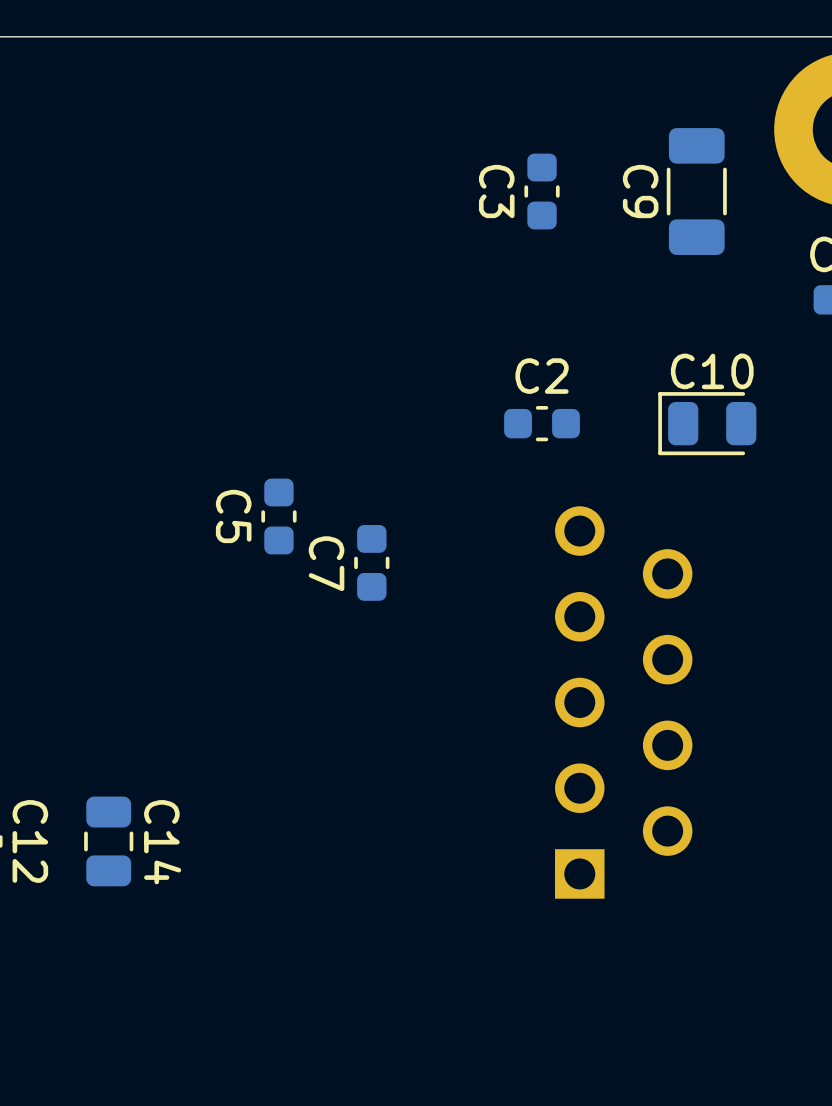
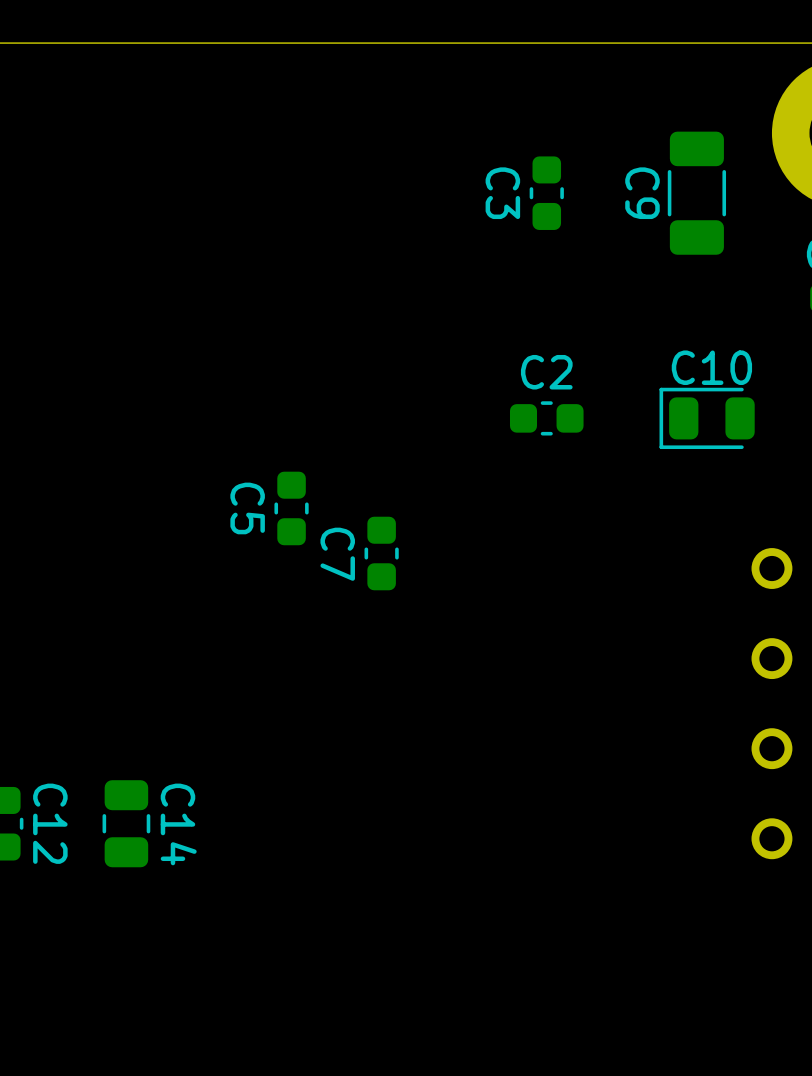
part: none -> (771, 568)
part: none -> (771, 658)
part: (623, 702) -> none
part: none -> (771, 748)
part: none -> (771, 838)

